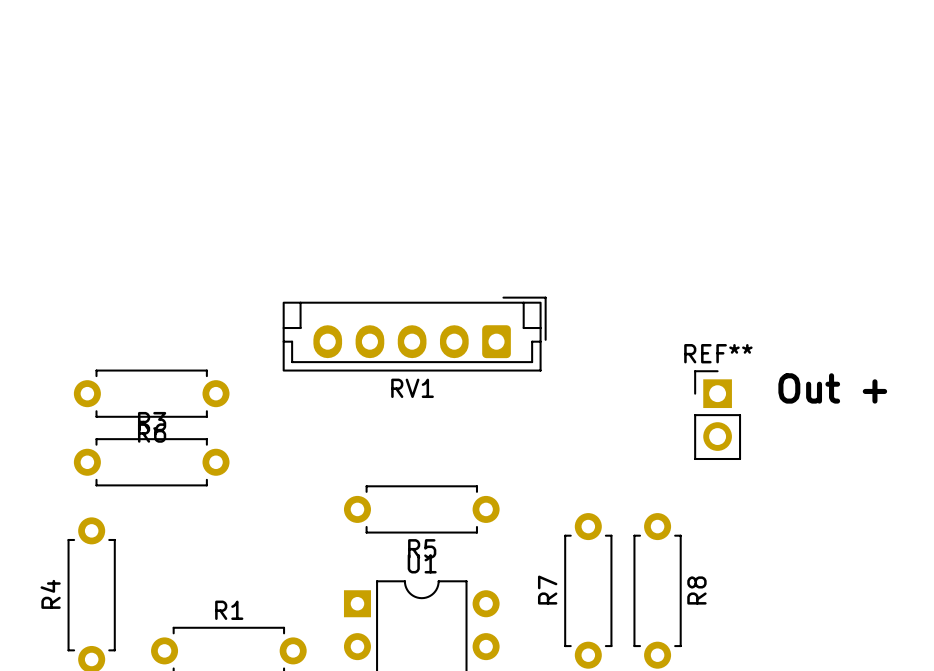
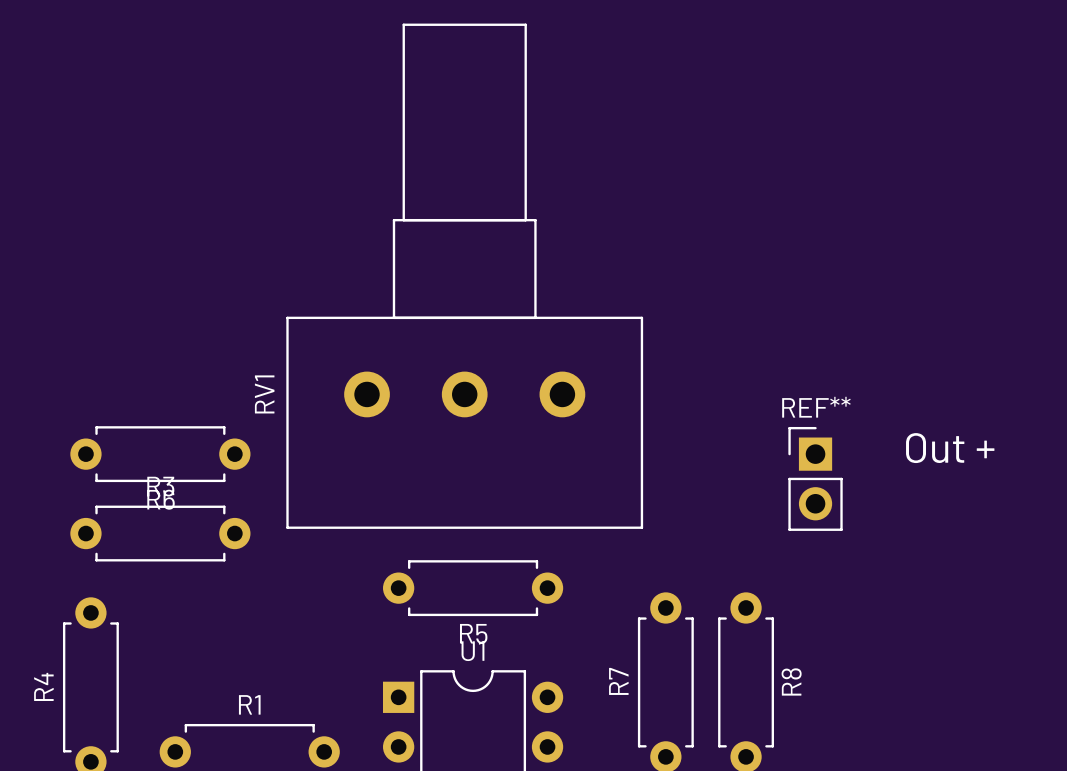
RV1 footprint: [282, 296, 547, 372] -> [286, 23, 644, 529]
RV1 name position: RV1 (412, 388) -> RV1 (264, 394)

